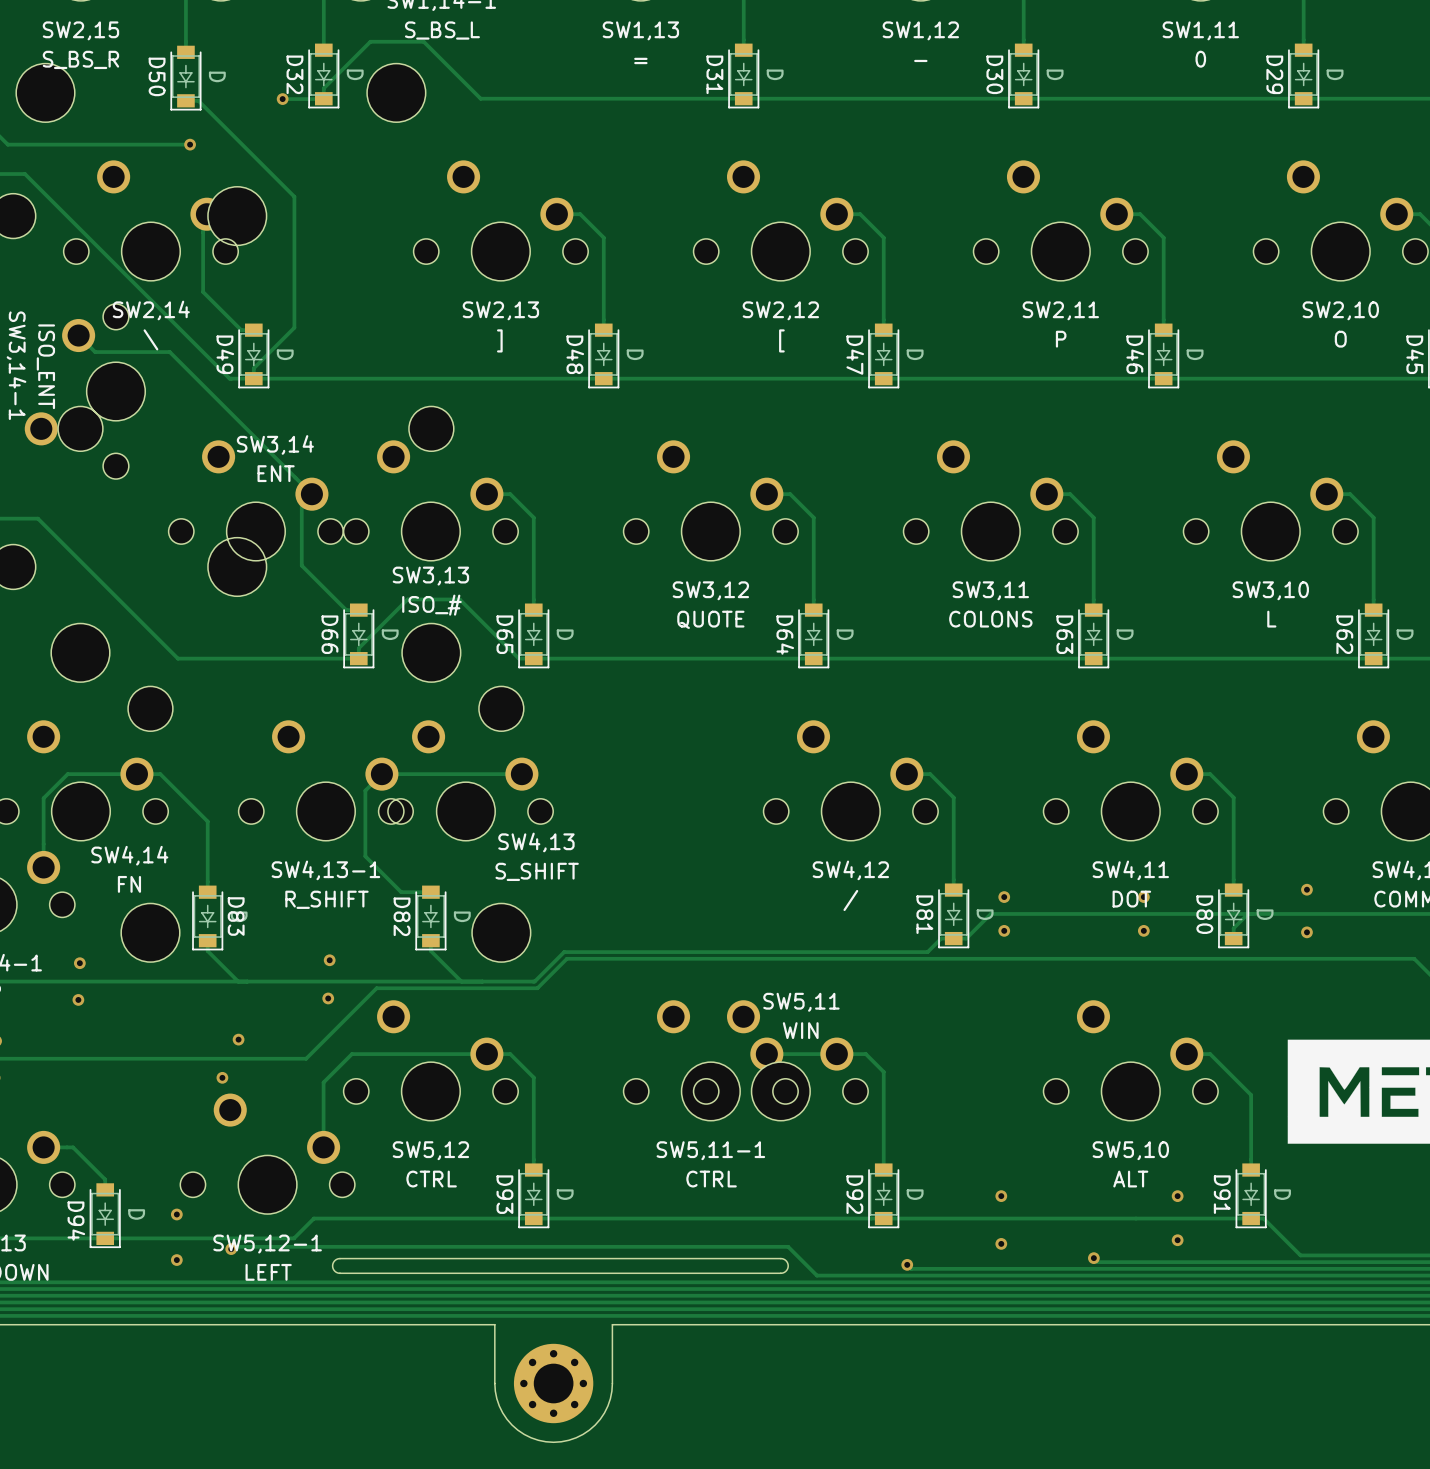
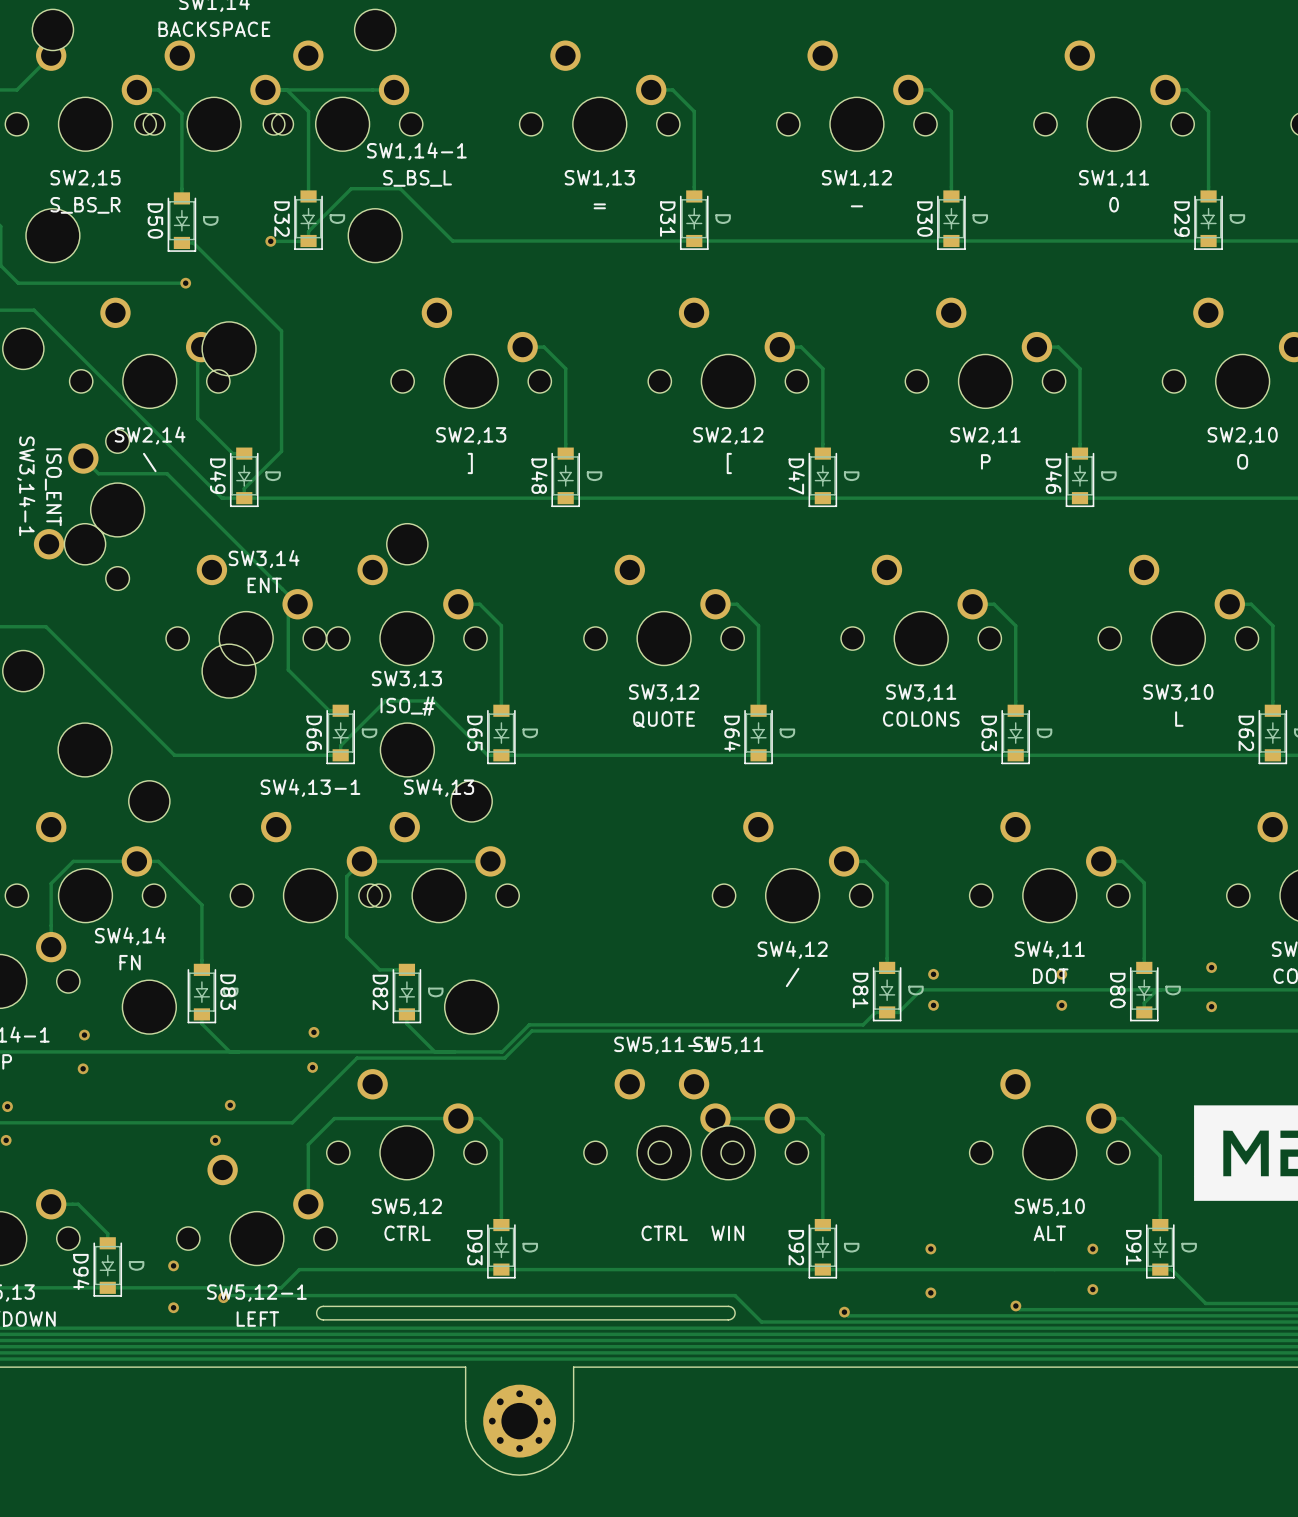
SW4,13 name position: SW4,13 (536, 842) -> SW4,13 (439, 787)
SW4,13-1 name position: SW4,13-1 (325, 870) -> SW4,13-1 (310, 787)
SW4,13 value: S_SHIFT (537, 871) -> none
SW4,13-1 value: R_SHIFT (326, 899) -> none
SW5,11 name position: SW5,11 (801, 1002) -> SW5,11 (728, 1045)
SW5,11 value position: WIN (800, 1030) -> WIN (727, 1233)
SW5,11-1 name position: SW5,11-1 (710, 1150) -> SW5,11-1 (664, 1045)

